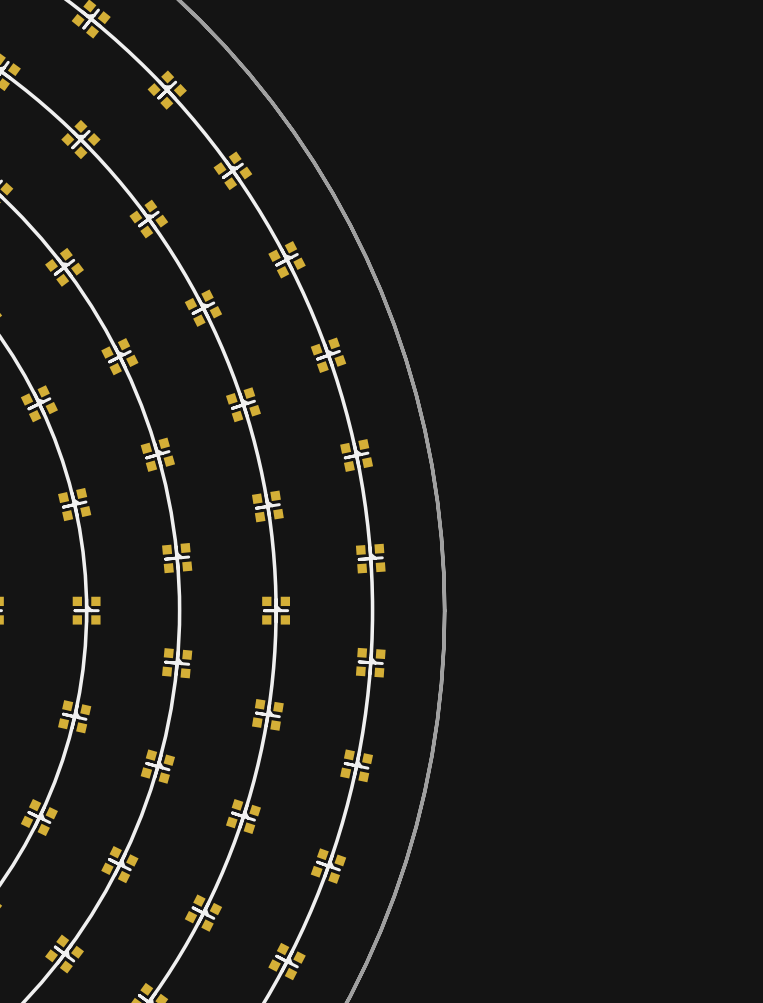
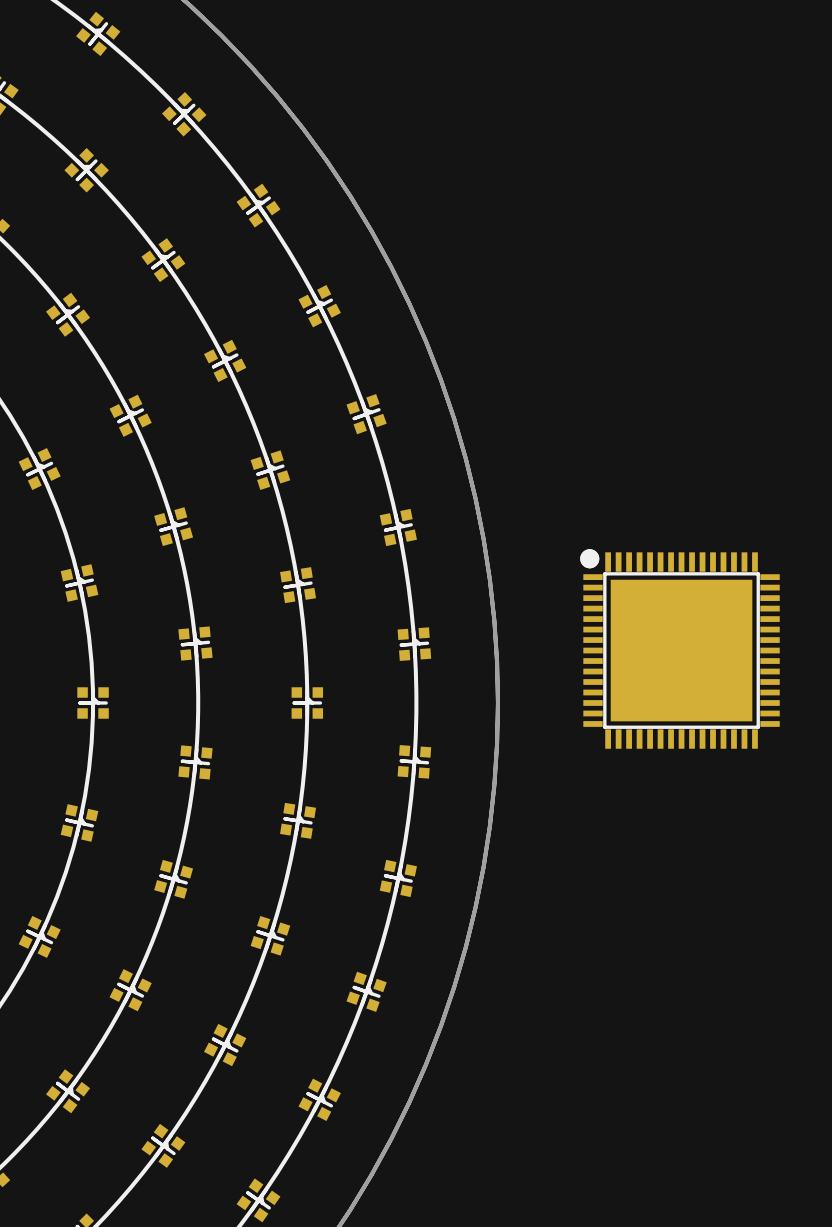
part: none -> (679, 648)

